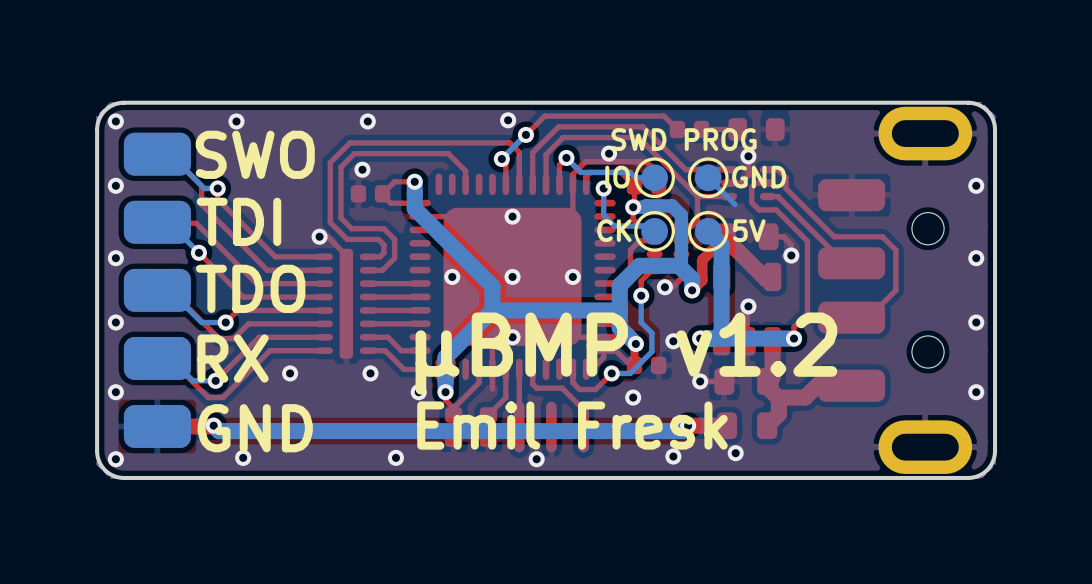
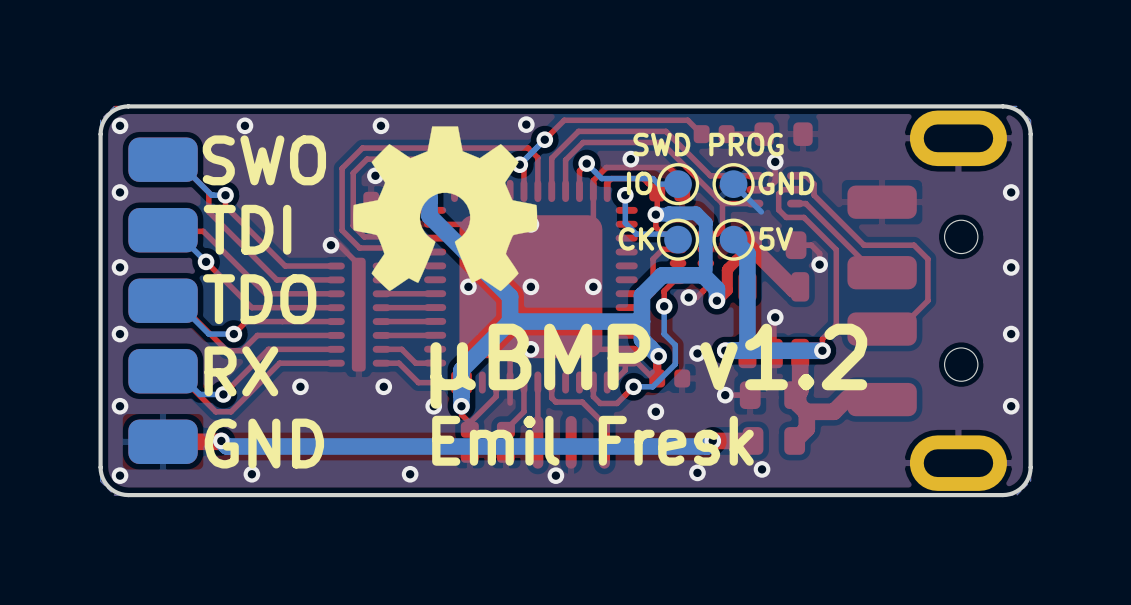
drawing: none -> [353, 126, 538, 292]

